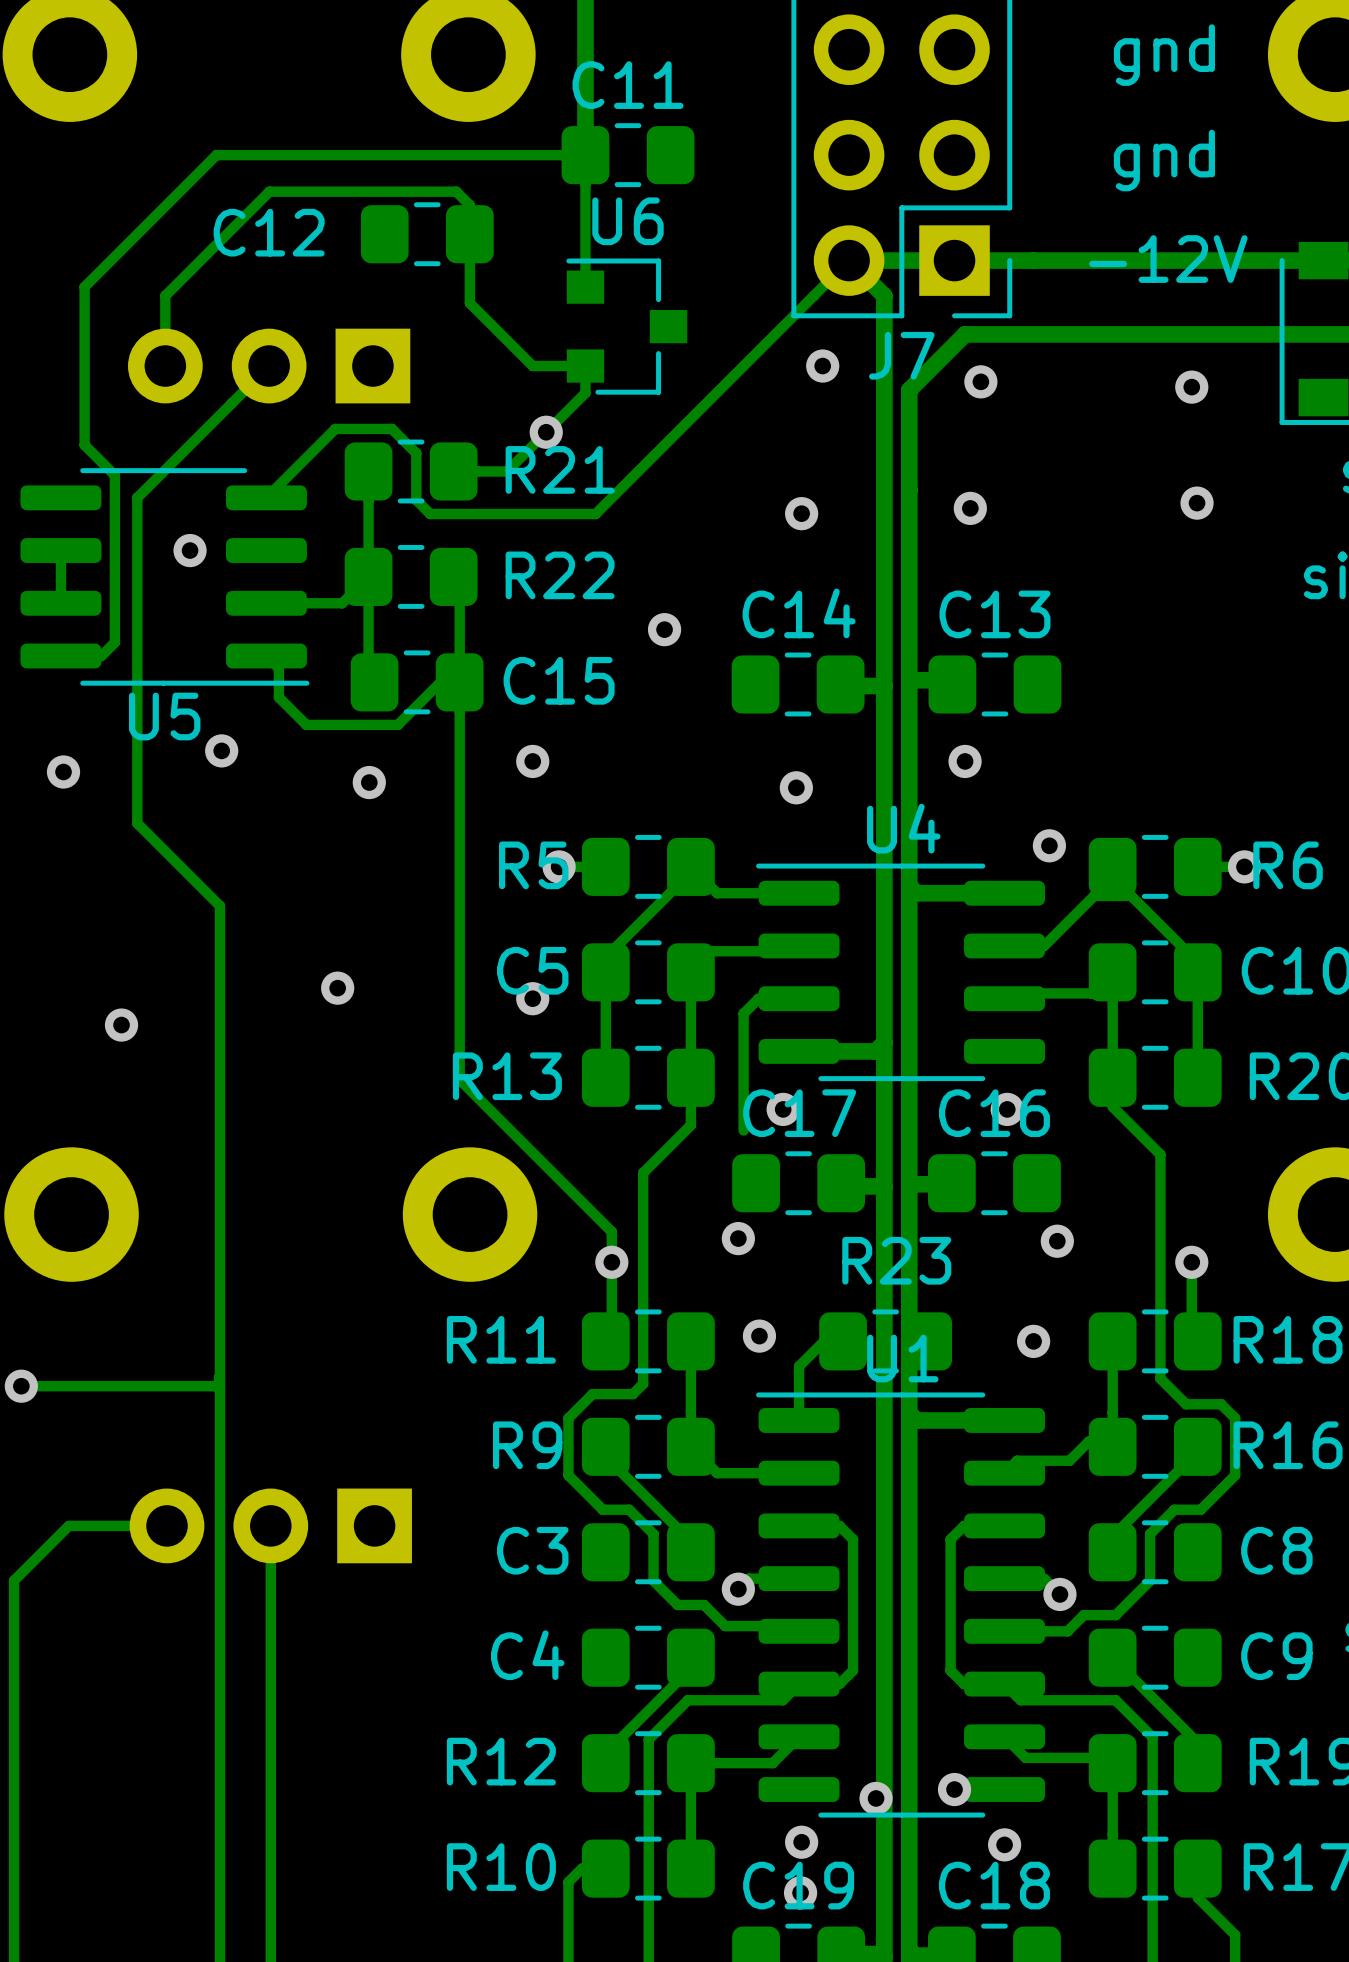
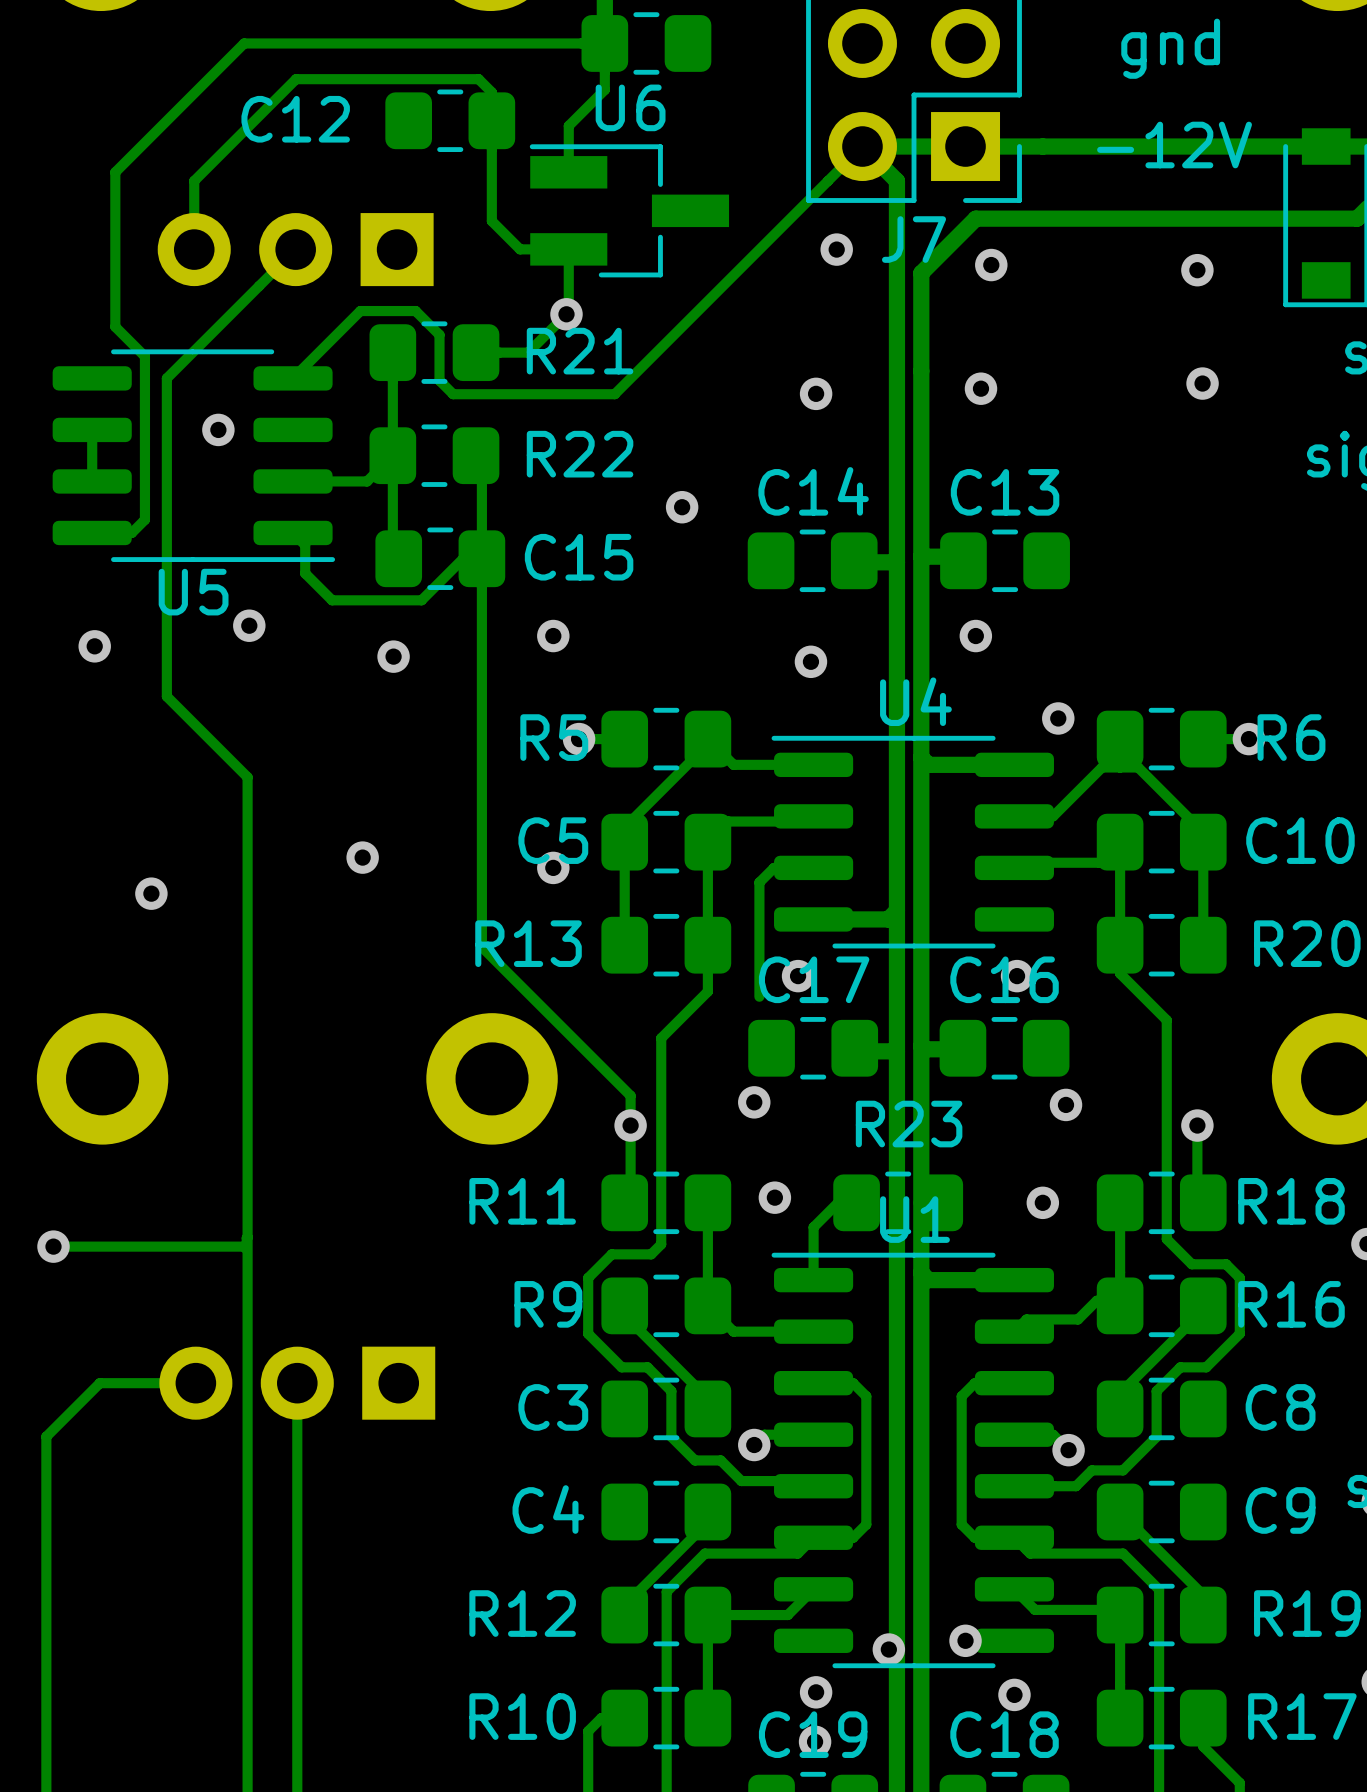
track: (585, 202) (585, 287) -> (604, 89) (568, 125) (568, 172)
U6 footprint: [566, 258, 688, 395] -> [529, 144, 730, 278]
track: (469, 303) (532, 366) (585, 366) (585, 393) (548, 429) -> (491, 188) (491, 221) (520, 249) (568, 249) (568, 312)

